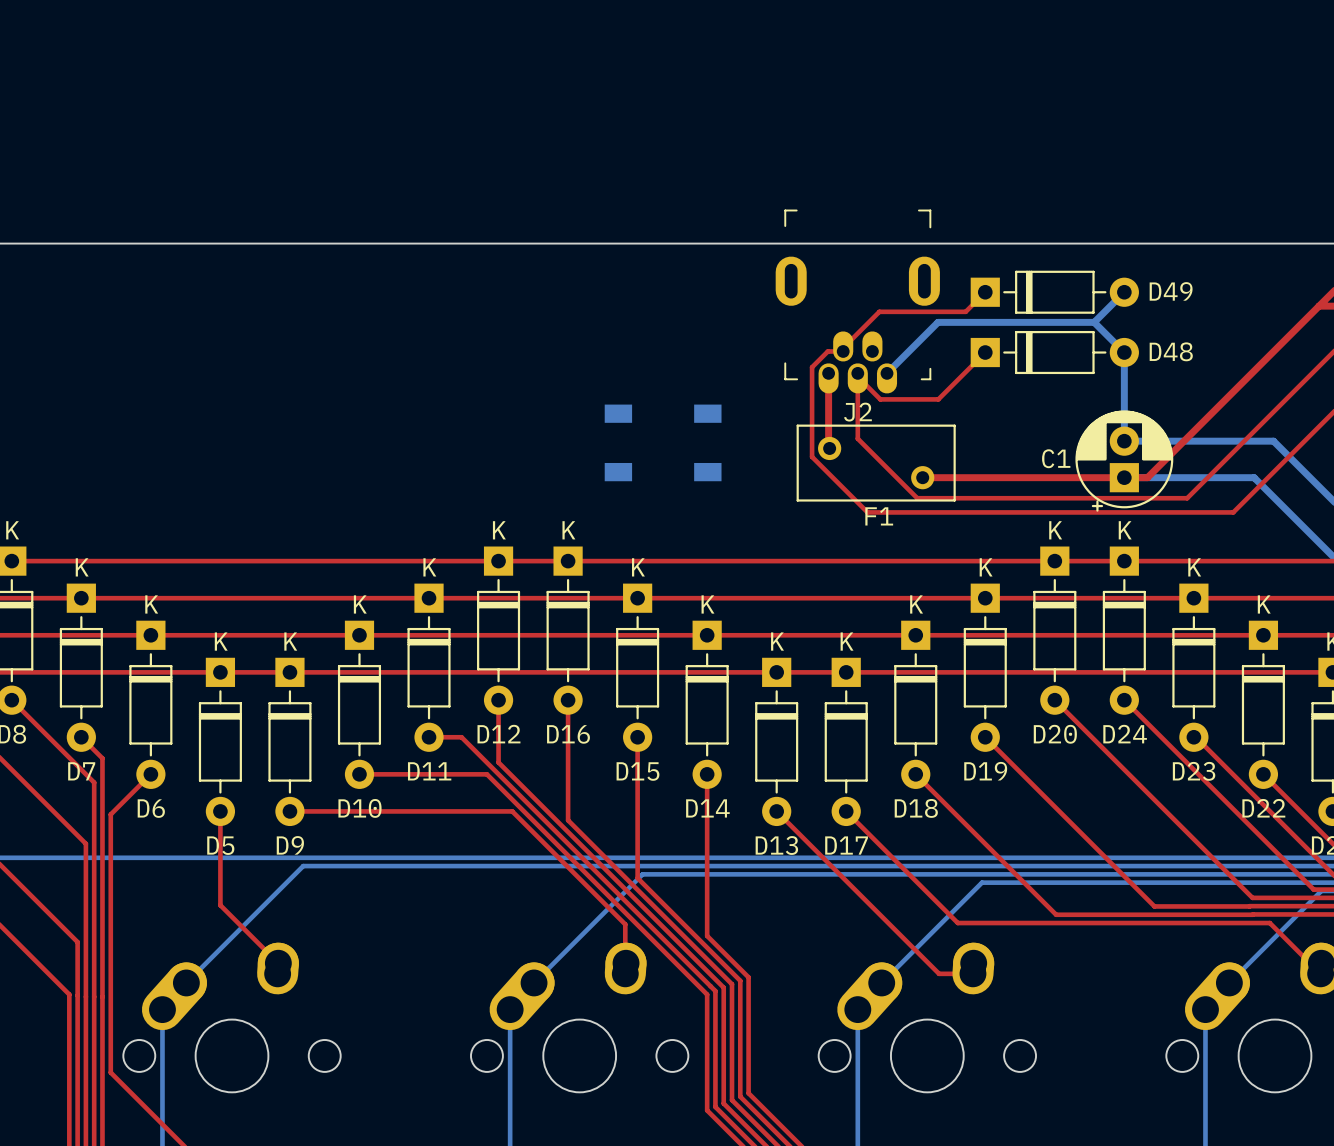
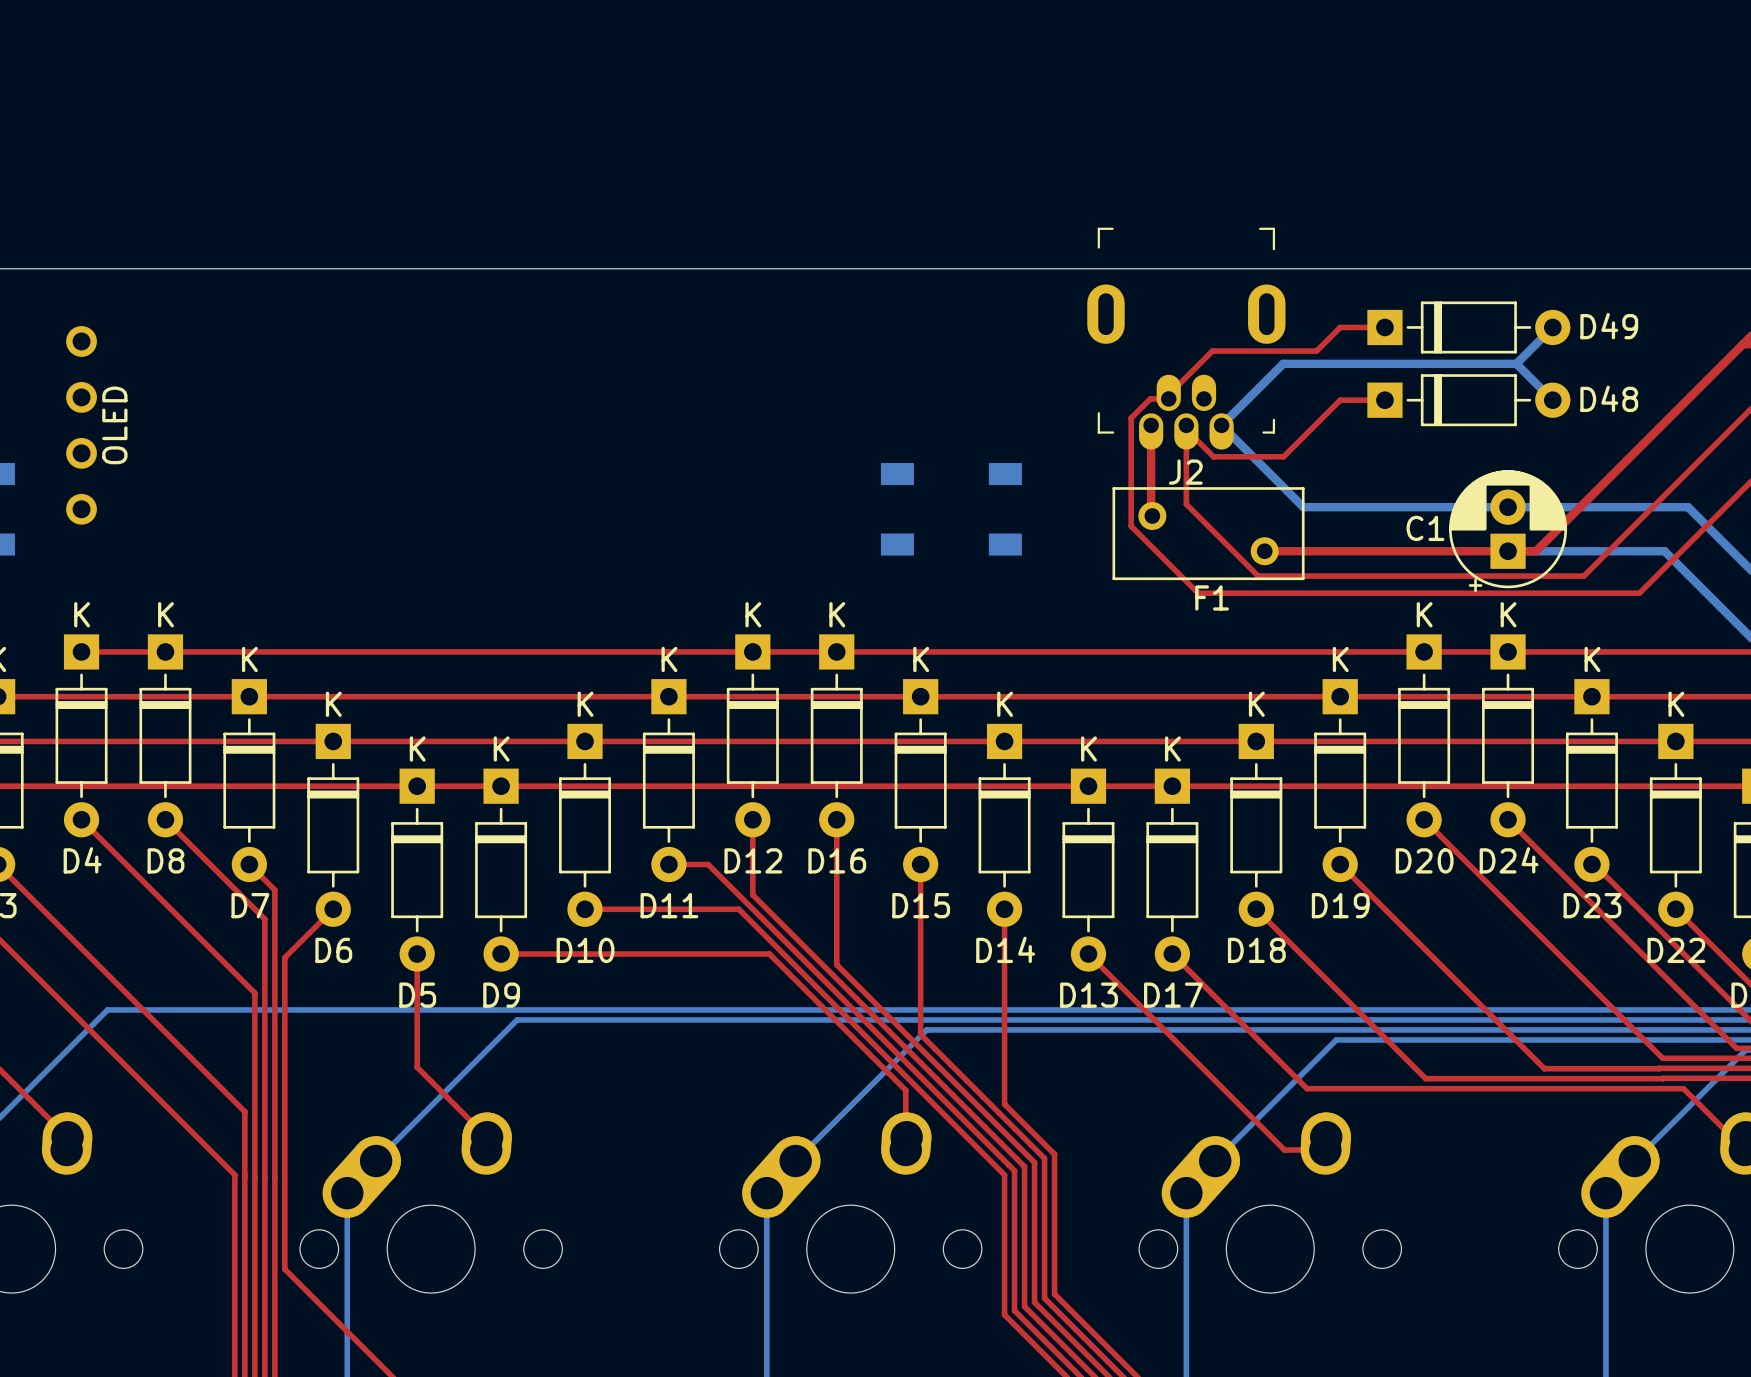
top track: none -> (1340, 327) (1384, 327)
D49 position: (1054, 292) -> (1468, 327)
bottom track: (1124, 292) (1094, 322) (1124, 352) (1124, 441) -> (1221, 425) (1303, 507) (1508, 507)
bottom track: none -> (1552, 327) (1516, 363)
bottom track: none -> (1471, 363) (1516, 363)
bottom track: none -> (1516, 363) (1552, 400)
top track: none -> (1340, 400) (1384, 400)
D48 position: (1054, 352) -> (1468, 400)

